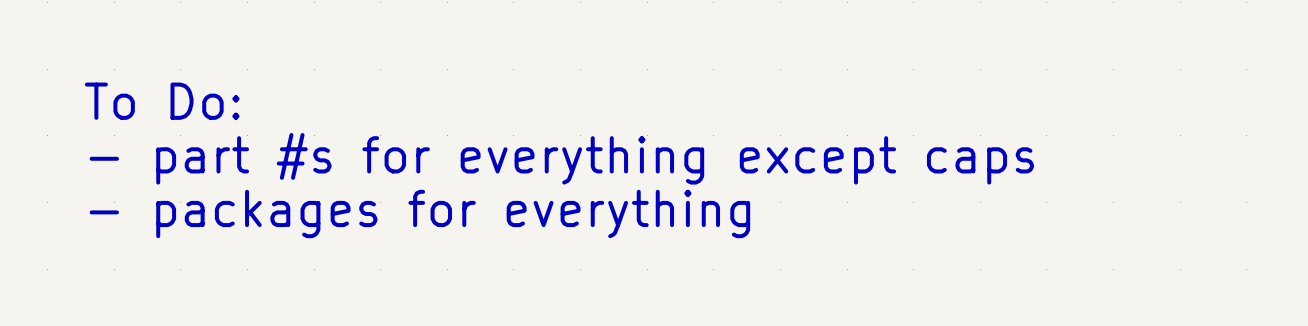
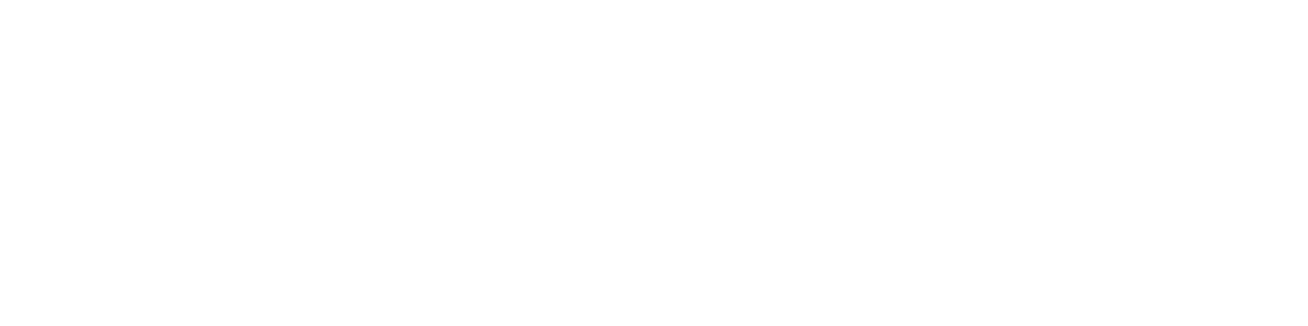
text: To Do: (162, 101) -> none
text: - part #s for everything except caps (561, 158) -> none
text: - packages for everything (419, 213) -> none

